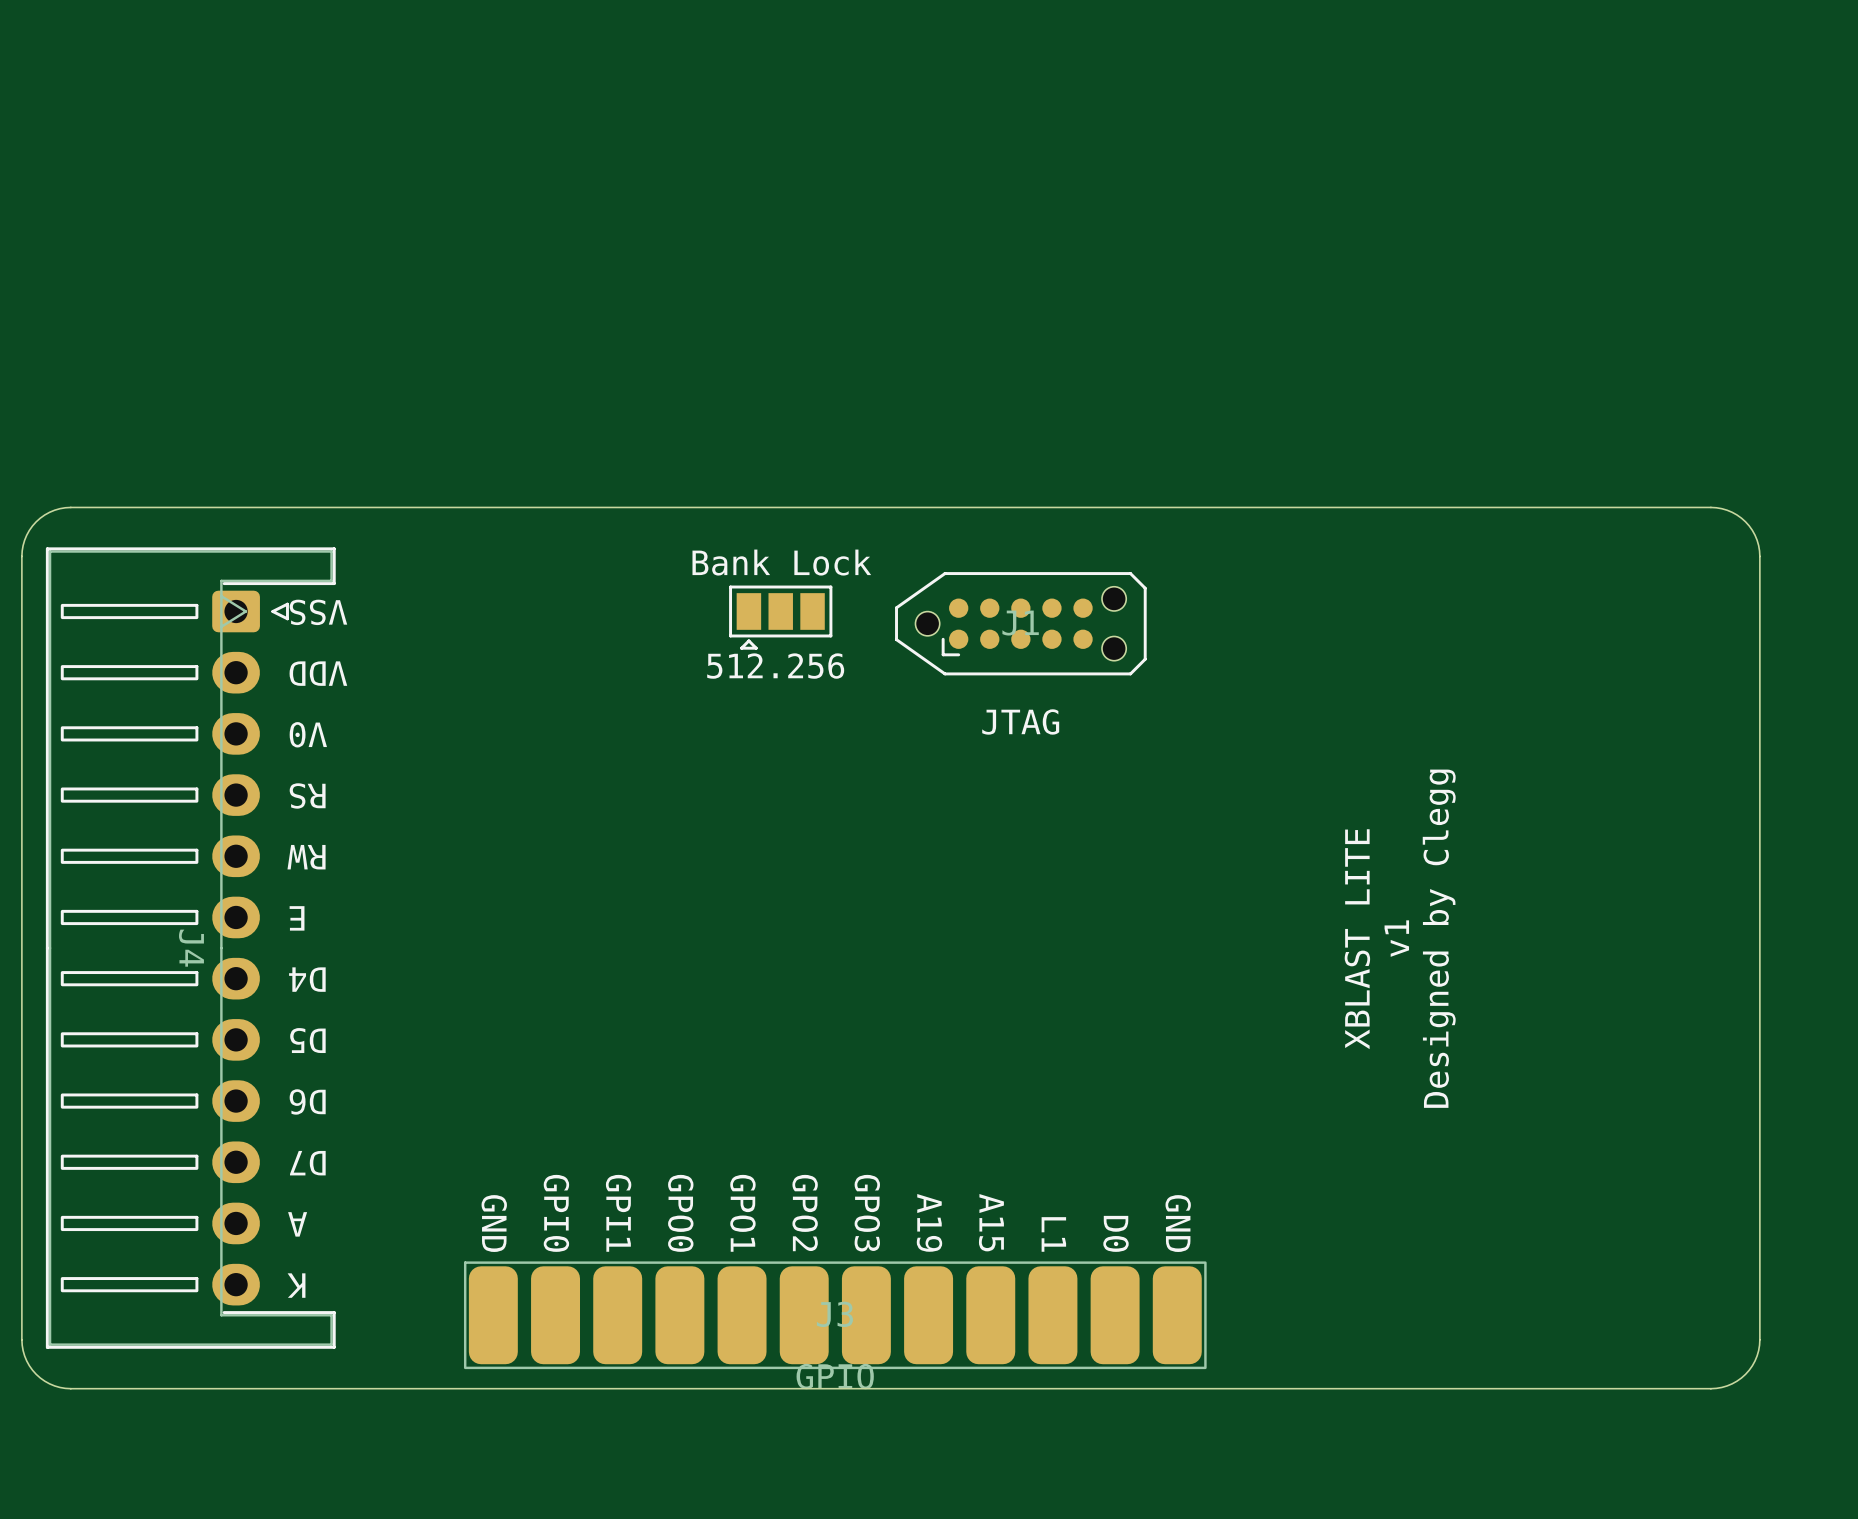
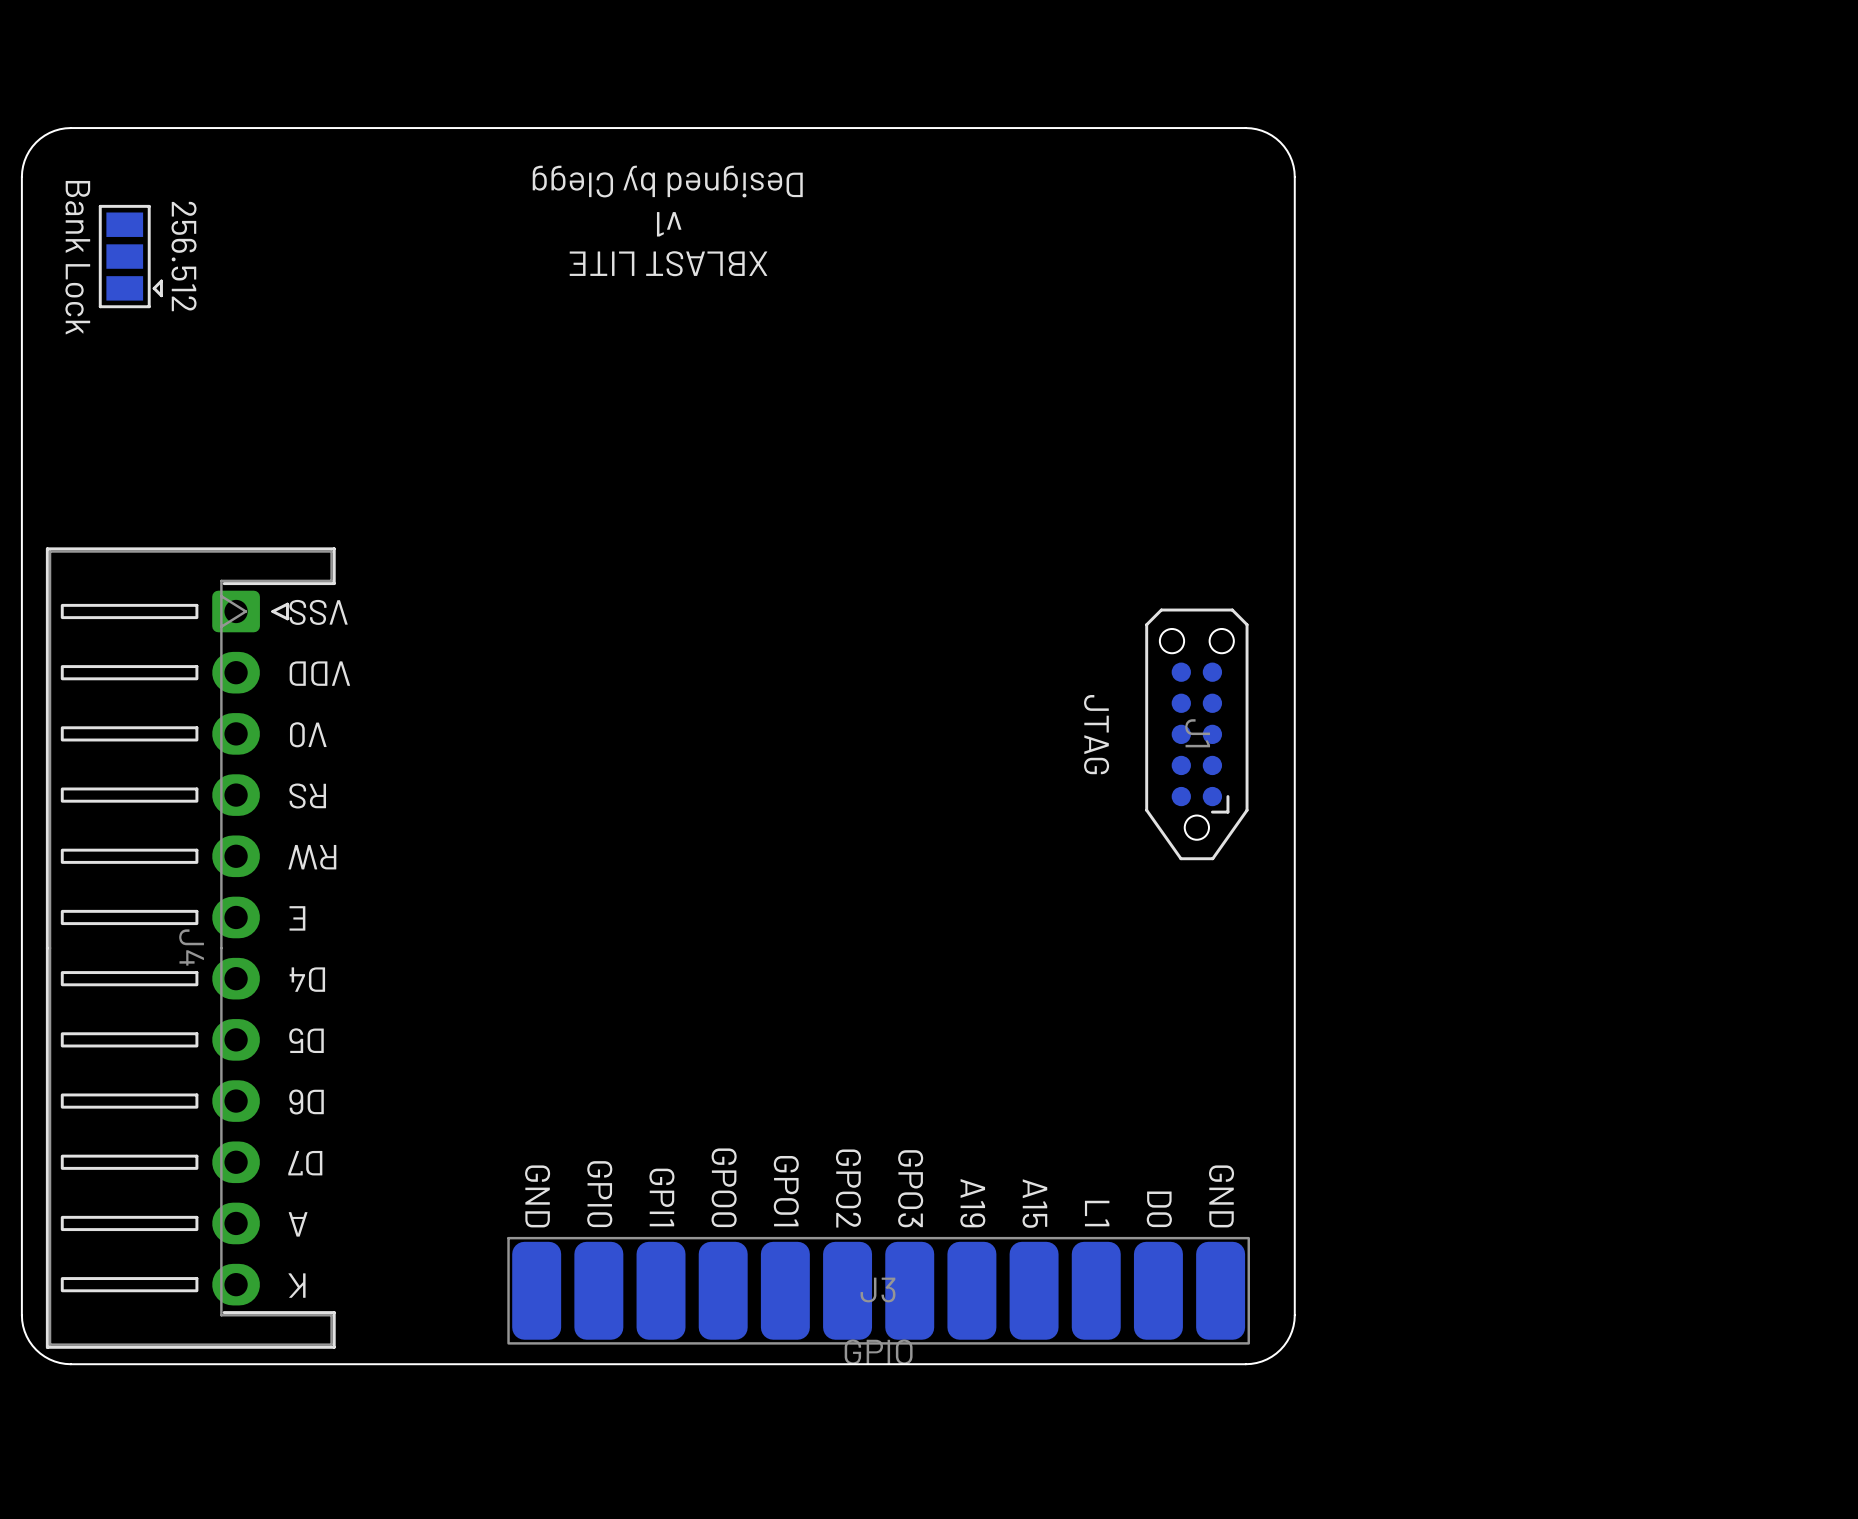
text: none -> Designed by Clegg (667, 181)
text: none -> v1 (669, 224)
part: none -> Bank Lock (130, 256)
text: none -> 256.512 (184, 256)
text: none -> XBLAST LITE (668, 263)
board edge: (21, 556) (26, 535) (36, 521) (49, 512) (70, 507) (1710, 507) (1732, 512) (1741, 518) (1752, 530) (1758, 545) (1759, 556) (1759, 1339) (1755, 1360) (1745, 1374) (1727, 1385) (1710, 1388) (70, 1388) (49, 1383) (36, 1374) (29, 1365) (22, 1345) (21, 1315) -> (21, 556) (22, 171) (24, 160) (32, 146) (44, 135) (54, 130) (70, 128) (1245, 128) (1261, 130) (1276, 138) (1284, 146) (1292, 160) (1294, 177) (1294, 1315) (1289, 1336) (1280, 1349) (1267, 1359) (1245, 1364) (70, 1364) (49, 1359) (36, 1349) (24, 1331) (21, 1315)
part: Bank Lock (780, 617) -> none
J1 rotation: 0° (1020, 623) -> 90° counterclockwise (1196, 734)
J1 position: (1020, 623) -> (1196, 734)
text: 512.256 (775, 666) -> none
J1 value position: JTAG (1020, 721) -> JTAG (1096, 734)
text: v1 (1396, 938) -> none
text: Designed by Clegg (1439, 938) -> none
text: XBLAST LITE (1357, 939) -> none
text position: GPI0 (556, 1213) -> GPI0 (599, 1194)
text position: GPI1 (618, 1213) -> GPI1 (661, 1197)
text position: GPO0 (680, 1213) -> GPO0 (724, 1187)
text position: GPO1 (742, 1213) -> GPO1 (786, 1191)
text position: GPO2 (805, 1213) -> GPO2 (848, 1188)
text position: GPO3 (867, 1213) -> GPO3 (910, 1188)
text position: A19 (929, 1222) -> A19 (972, 1203)
text position: A15 (991, 1222) -> A15 (1034, 1203)
text position: GND (494, 1223) -> GND (537, 1196)
text position: GND (1178, 1223) -> GND (1221, 1196)
text position: D0 (1116, 1233) -> D0 (1159, 1209)
text position: L1 (1053, 1234) -> L1 (1097, 1213)
J3 position: (835, 1315) -> (878, 1290)

